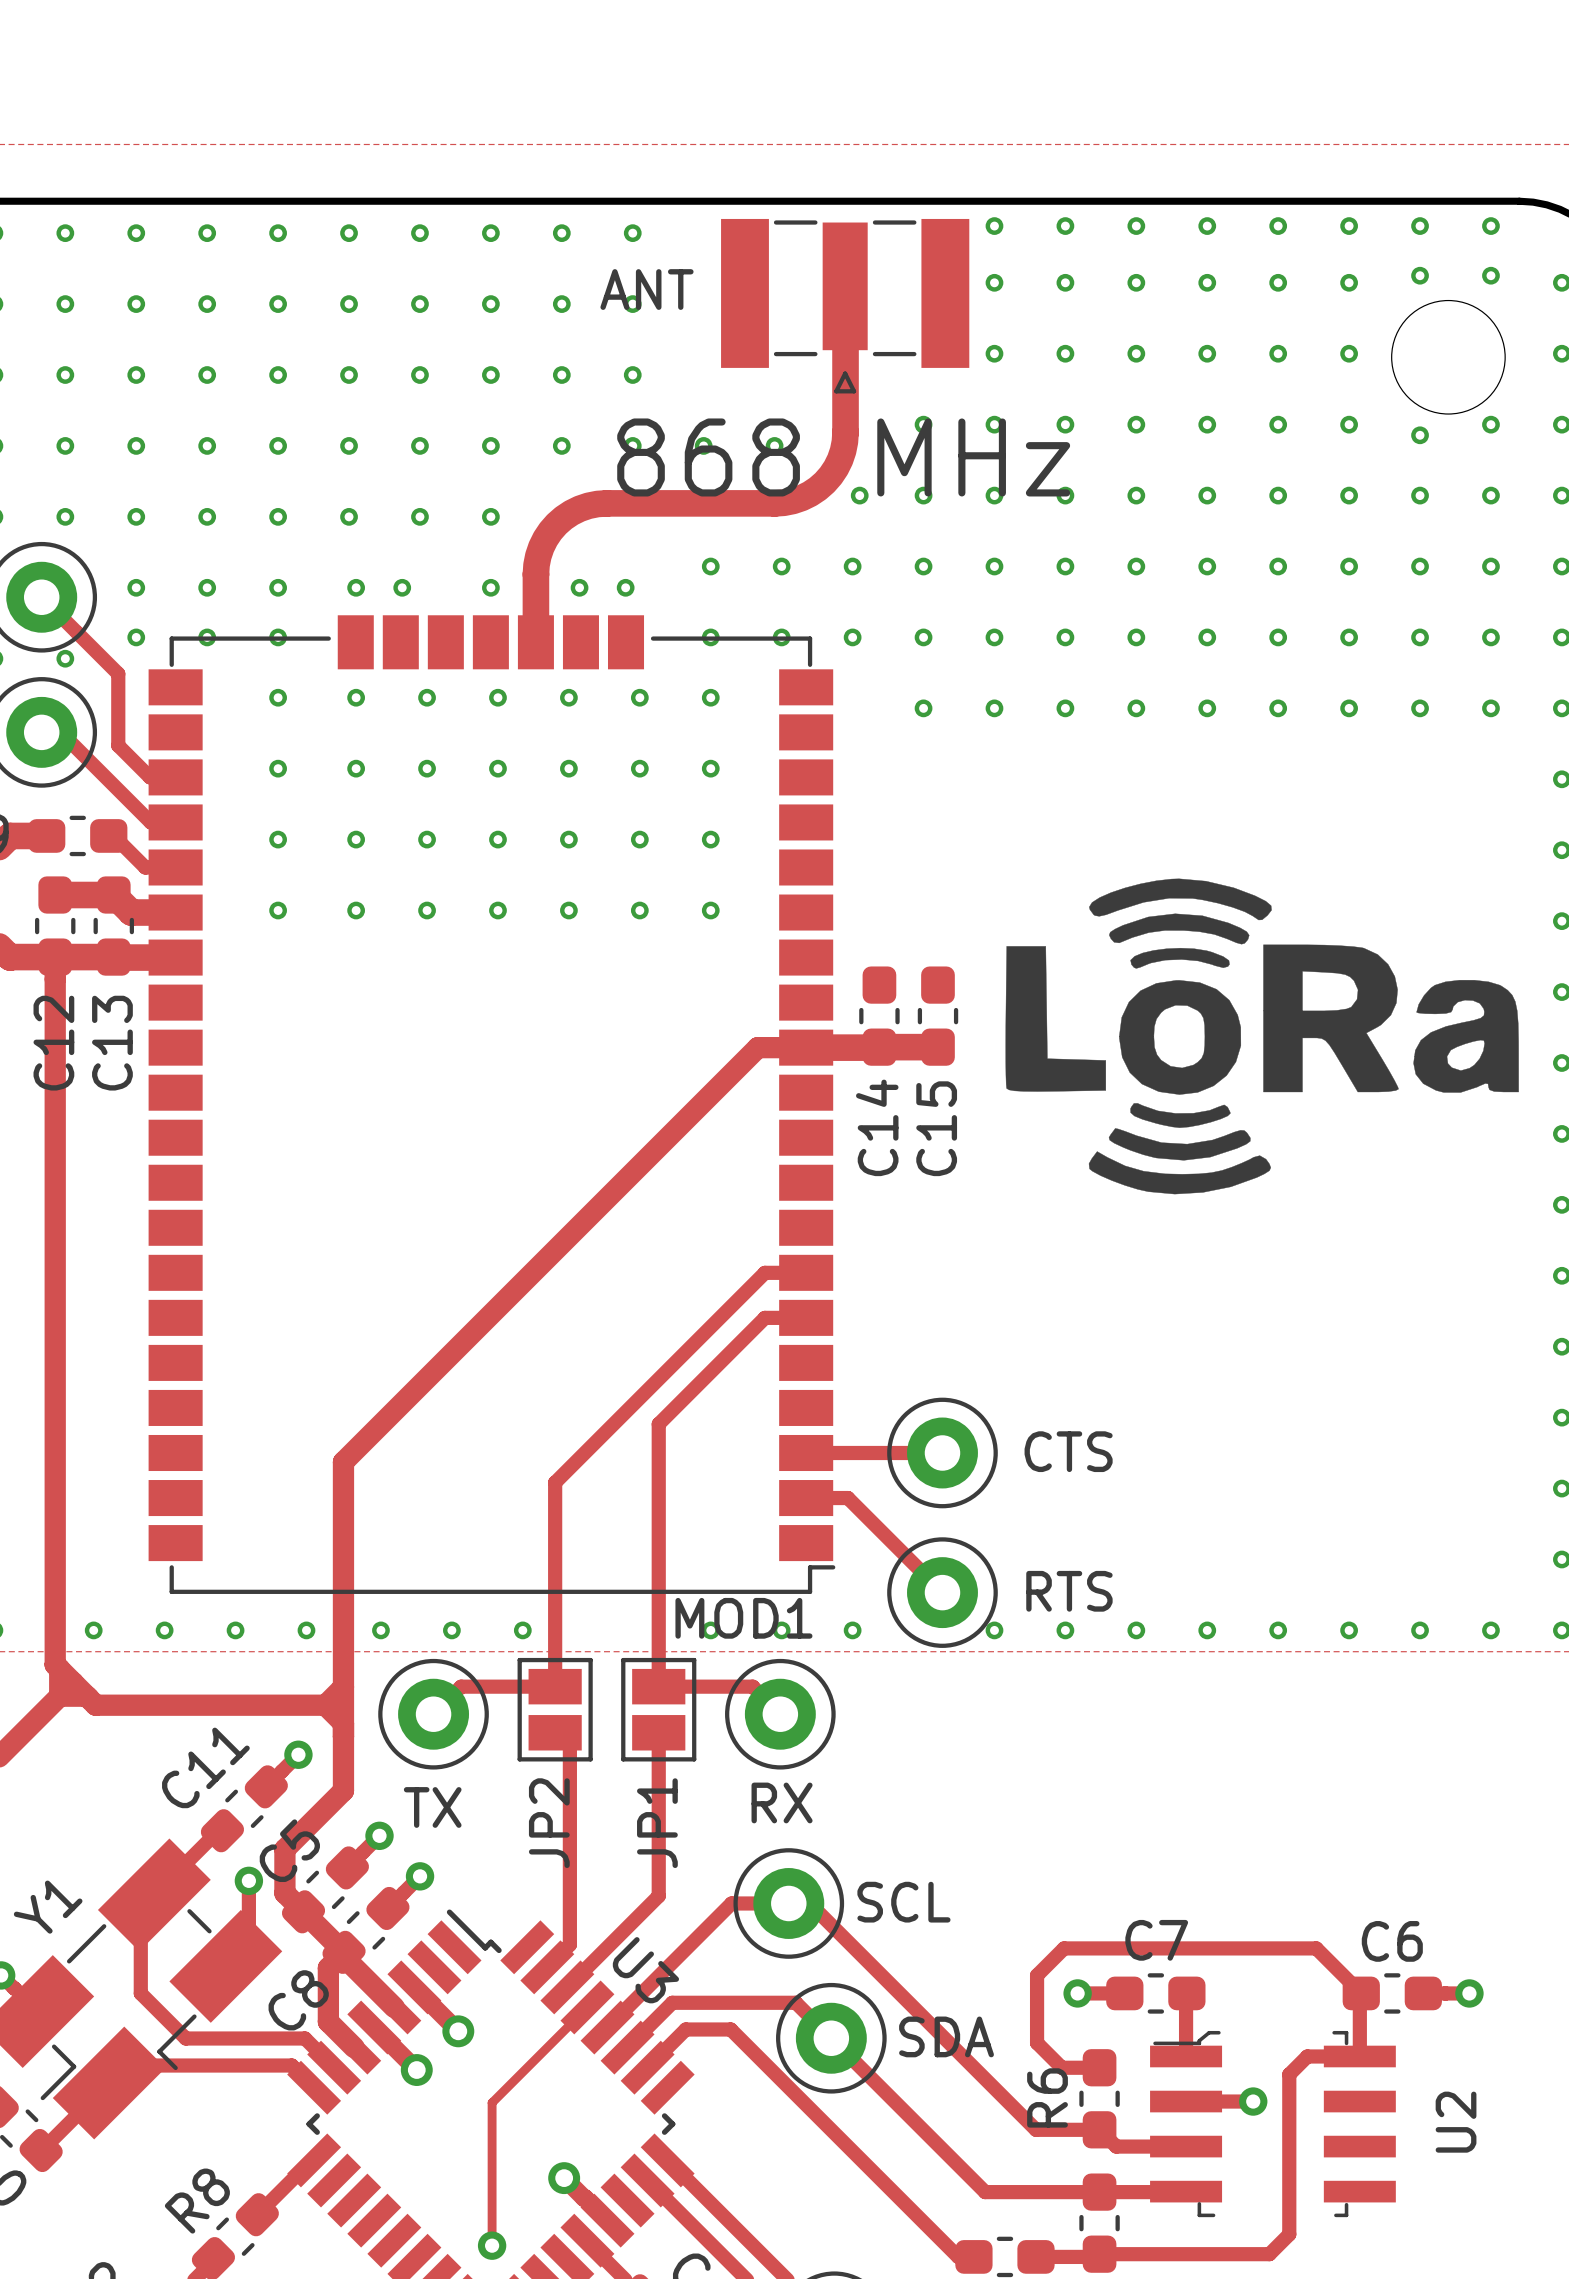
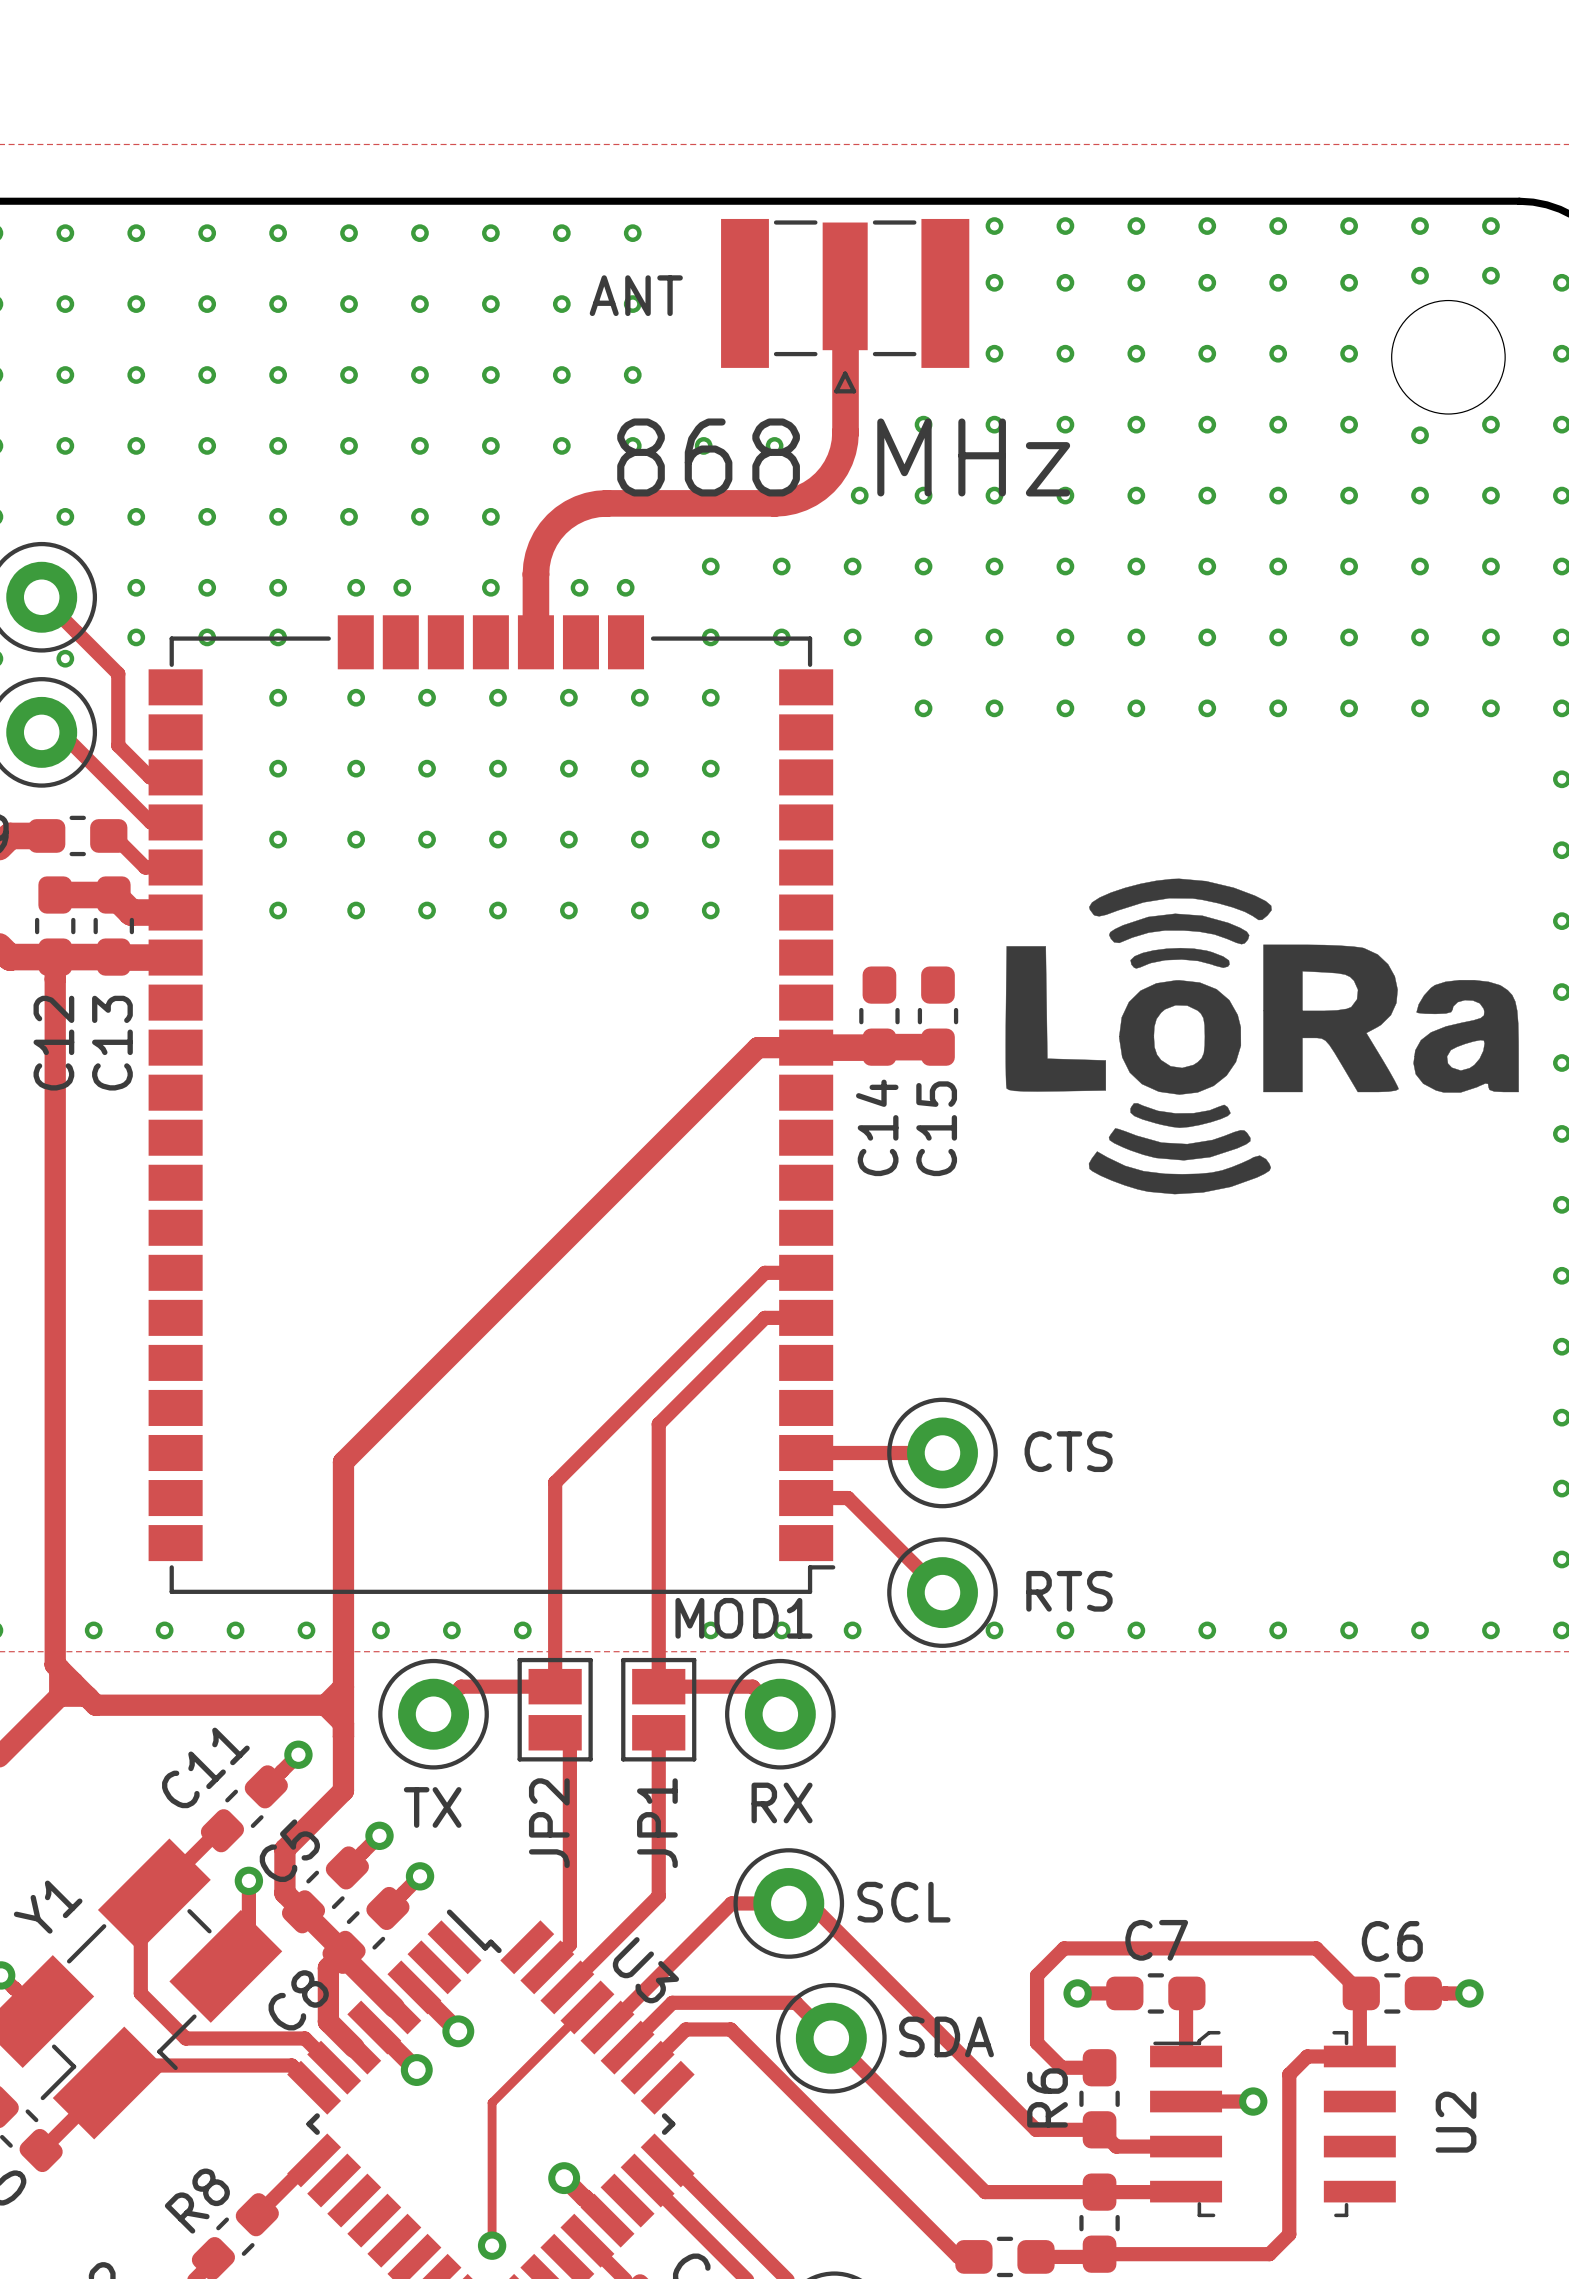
ANT name position: ANT (647, 289) -> ANT (636, 295)

